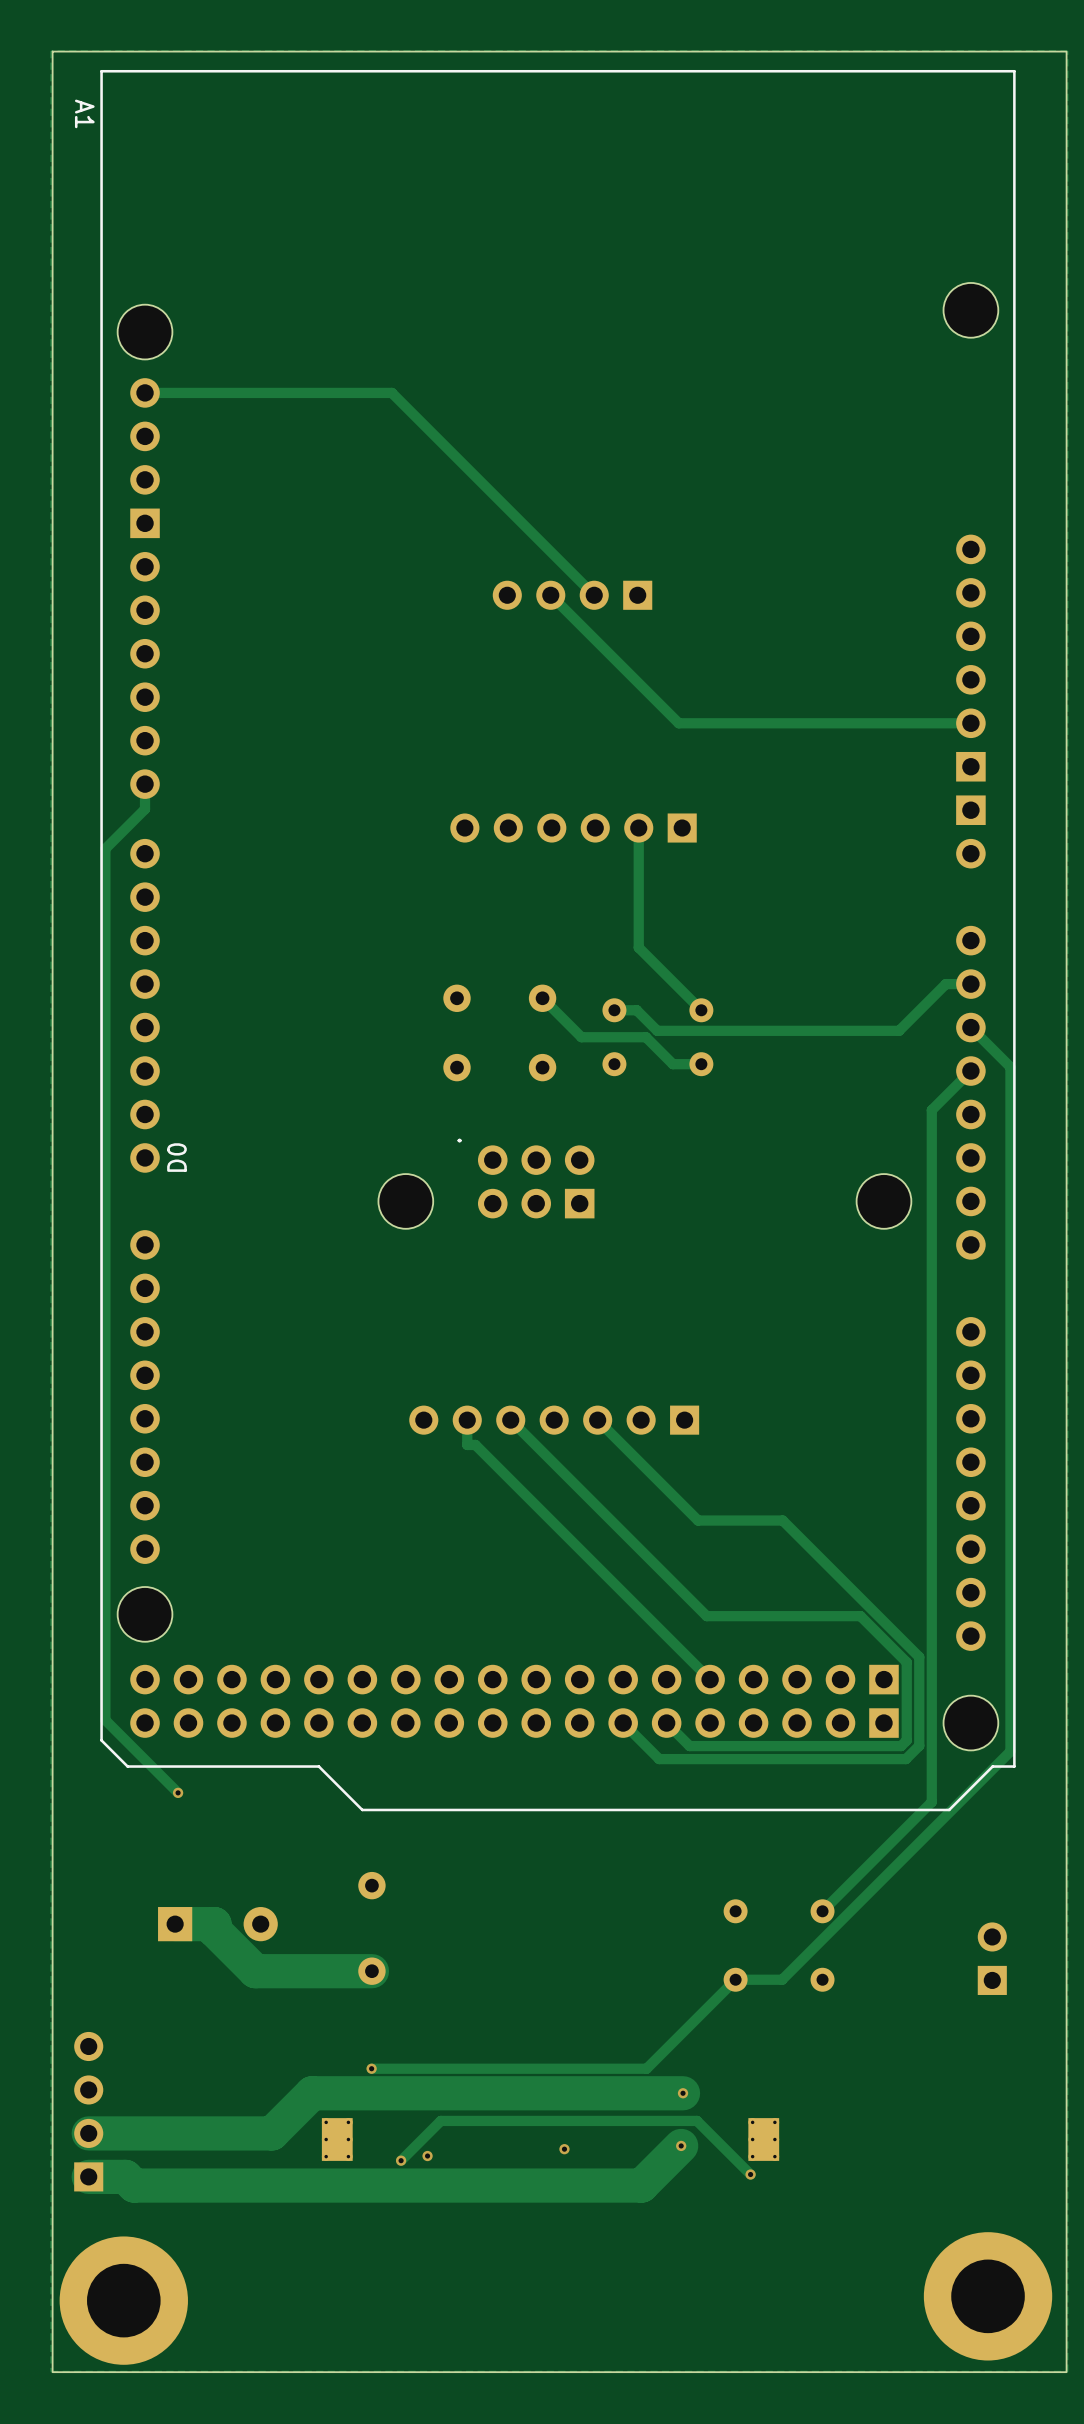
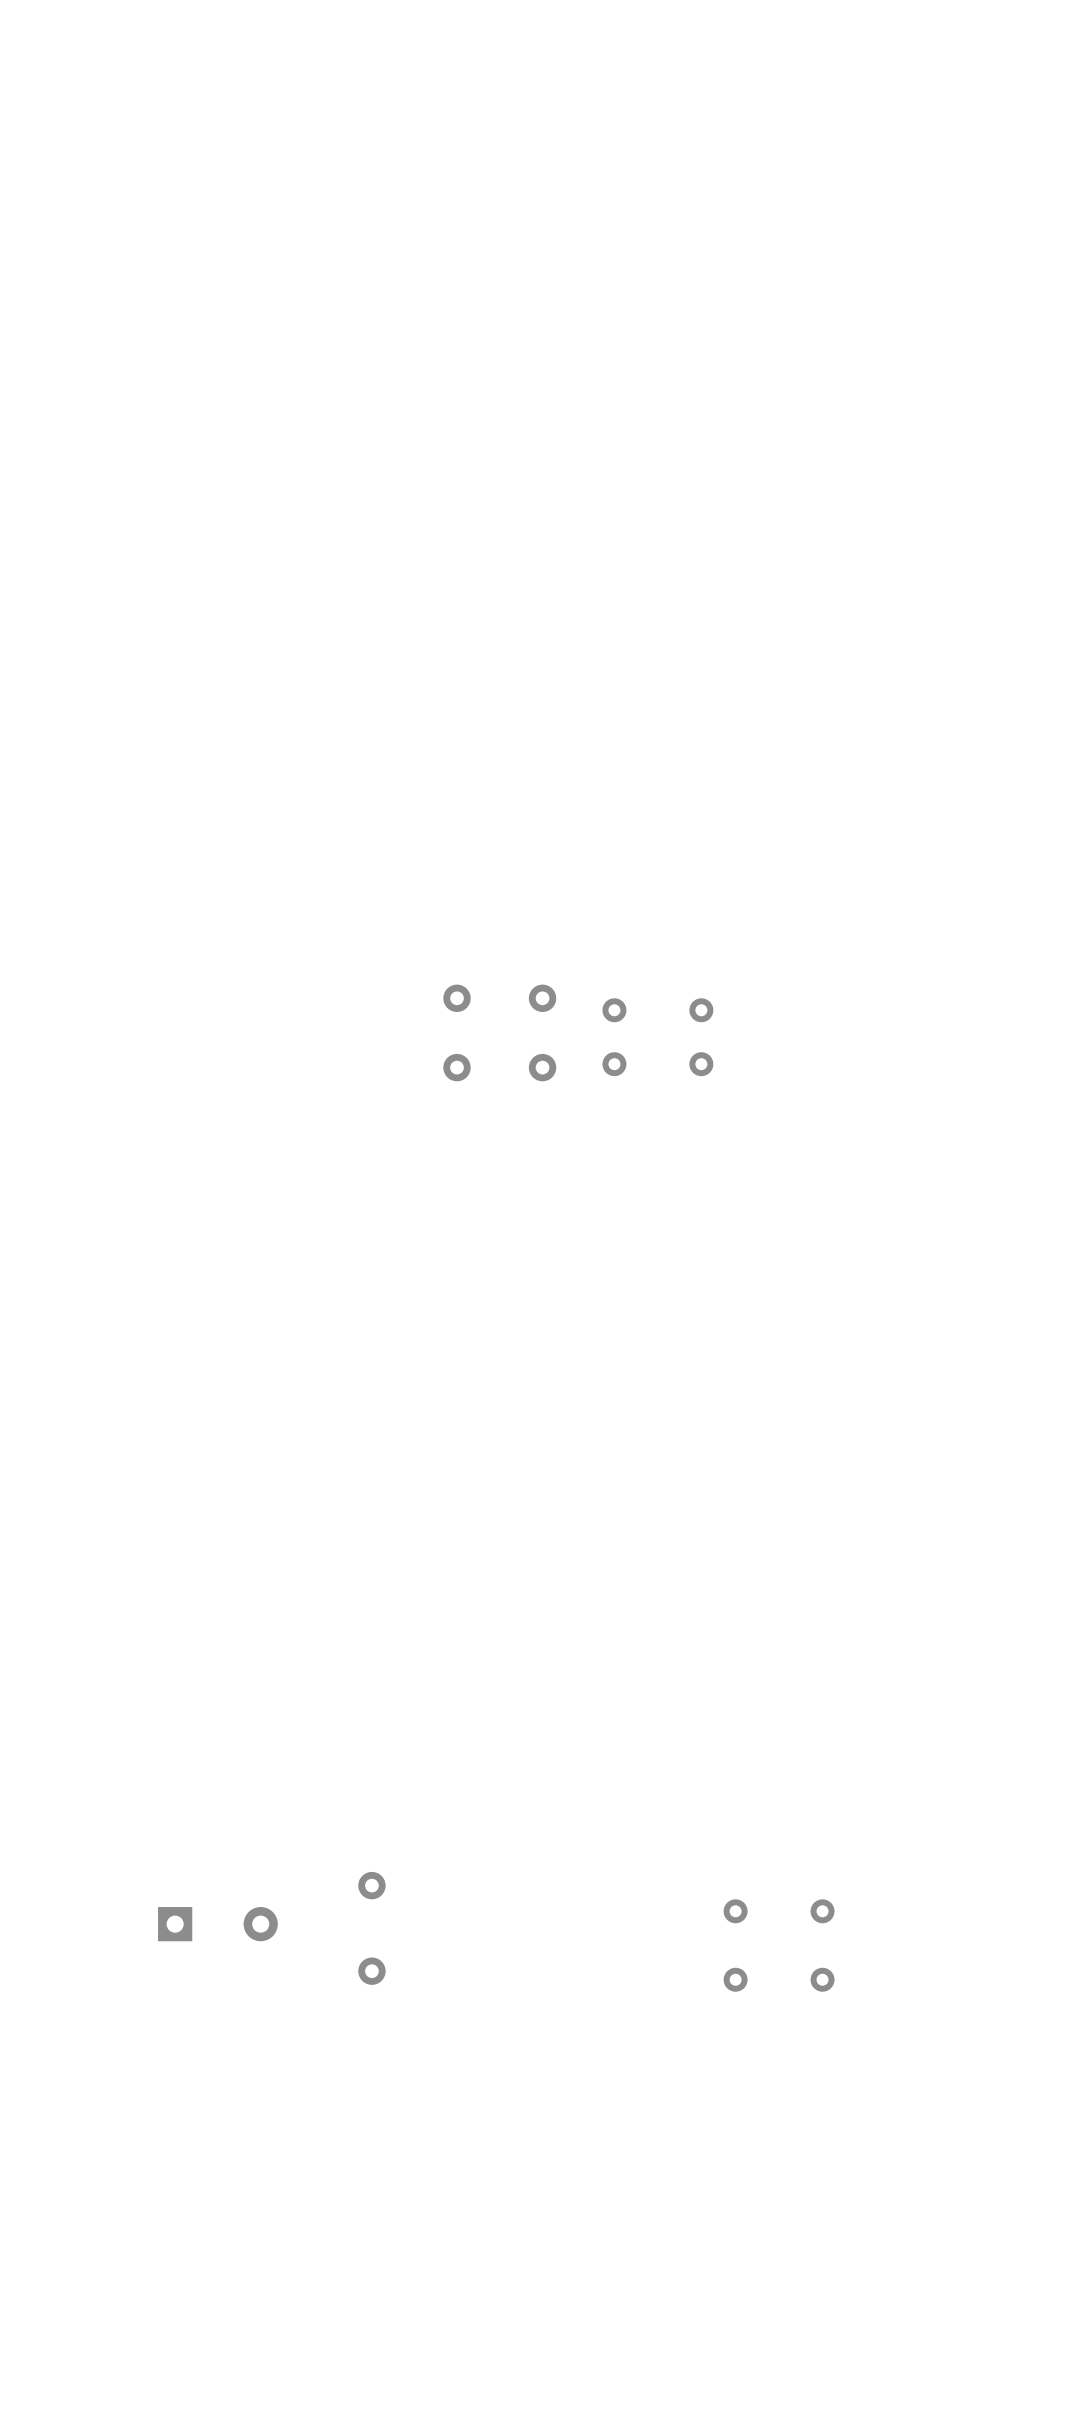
track: (145, 392) (391, 392) (594, 595) -> none
track: (550, 595) (678, 723) (970, 723) -> none
part: (572, 595) -> none
track: (145, 784) (145, 809) (105, 848) (105, 1720) (178, 1792) -> none
part: (573, 828) -> none
track: (638, 828) (638, 947) (701, 1010) -> none
track: (970, 984) (945, 984) (899, 1030) (657, 1030) (636, 1010) (614, 1010) -> none
track: (542, 998) (581, 1037) (645, 1037) (672, 1064) (701, 1064) -> none
track: (970, 1027) (1010, 1067) (1010, 1751) (782, 1979) (735, 1979) (646, 2068) (371, 2068) -> none
track: (970, 1071) (931, 1110) (931, 1802) (822, 1911) -> none
A1: (559, 1211) -> none
track: (467, 1420) (467, 1444) (475, 1444) (710, 1679) -> none
track: (510, 1420) (706, 1616) (860, 1616) (906, 1662) (906, 1740) (901, 1746) (689, 1746) (666, 1723) -> none
part: (554, 1420) -> none
track: (597, 1420) (698, 1520) (782, 1520) (919, 1657) (919, 1745) (905, 1759) (659, 1759) (623, 1723) -> none
via: (178, 1792) -> none
track: (175, 1924) (214, 1924) (214, 1930) (255, 1971) (371, 1971) -> none
part: (992, 1958) -> none
via: (371, 2068) -> none
track: (683, 2093) (312, 2093) (271, 2133) (88, 2133) -> none
via: (683, 2093) -> none
part: (88, 2111) -> none
part: (337, 2139) -> none
part: (763, 2139) -> none
track: (681, 2145) (641, 2185) (134, 2185) (125, 2176) (88, 2176) -> none
via: (681, 2145) -> none
via: (564, 2149) -> none
via: (427, 2156) -> none
track: (401, 2160) (440, 2120) (696, 2120) (750, 2174) -> none
via: (401, 2160) -> none
via: (750, 2174) -> none
part: (988, 2296) -> none
part: (123, 2300) -> none

